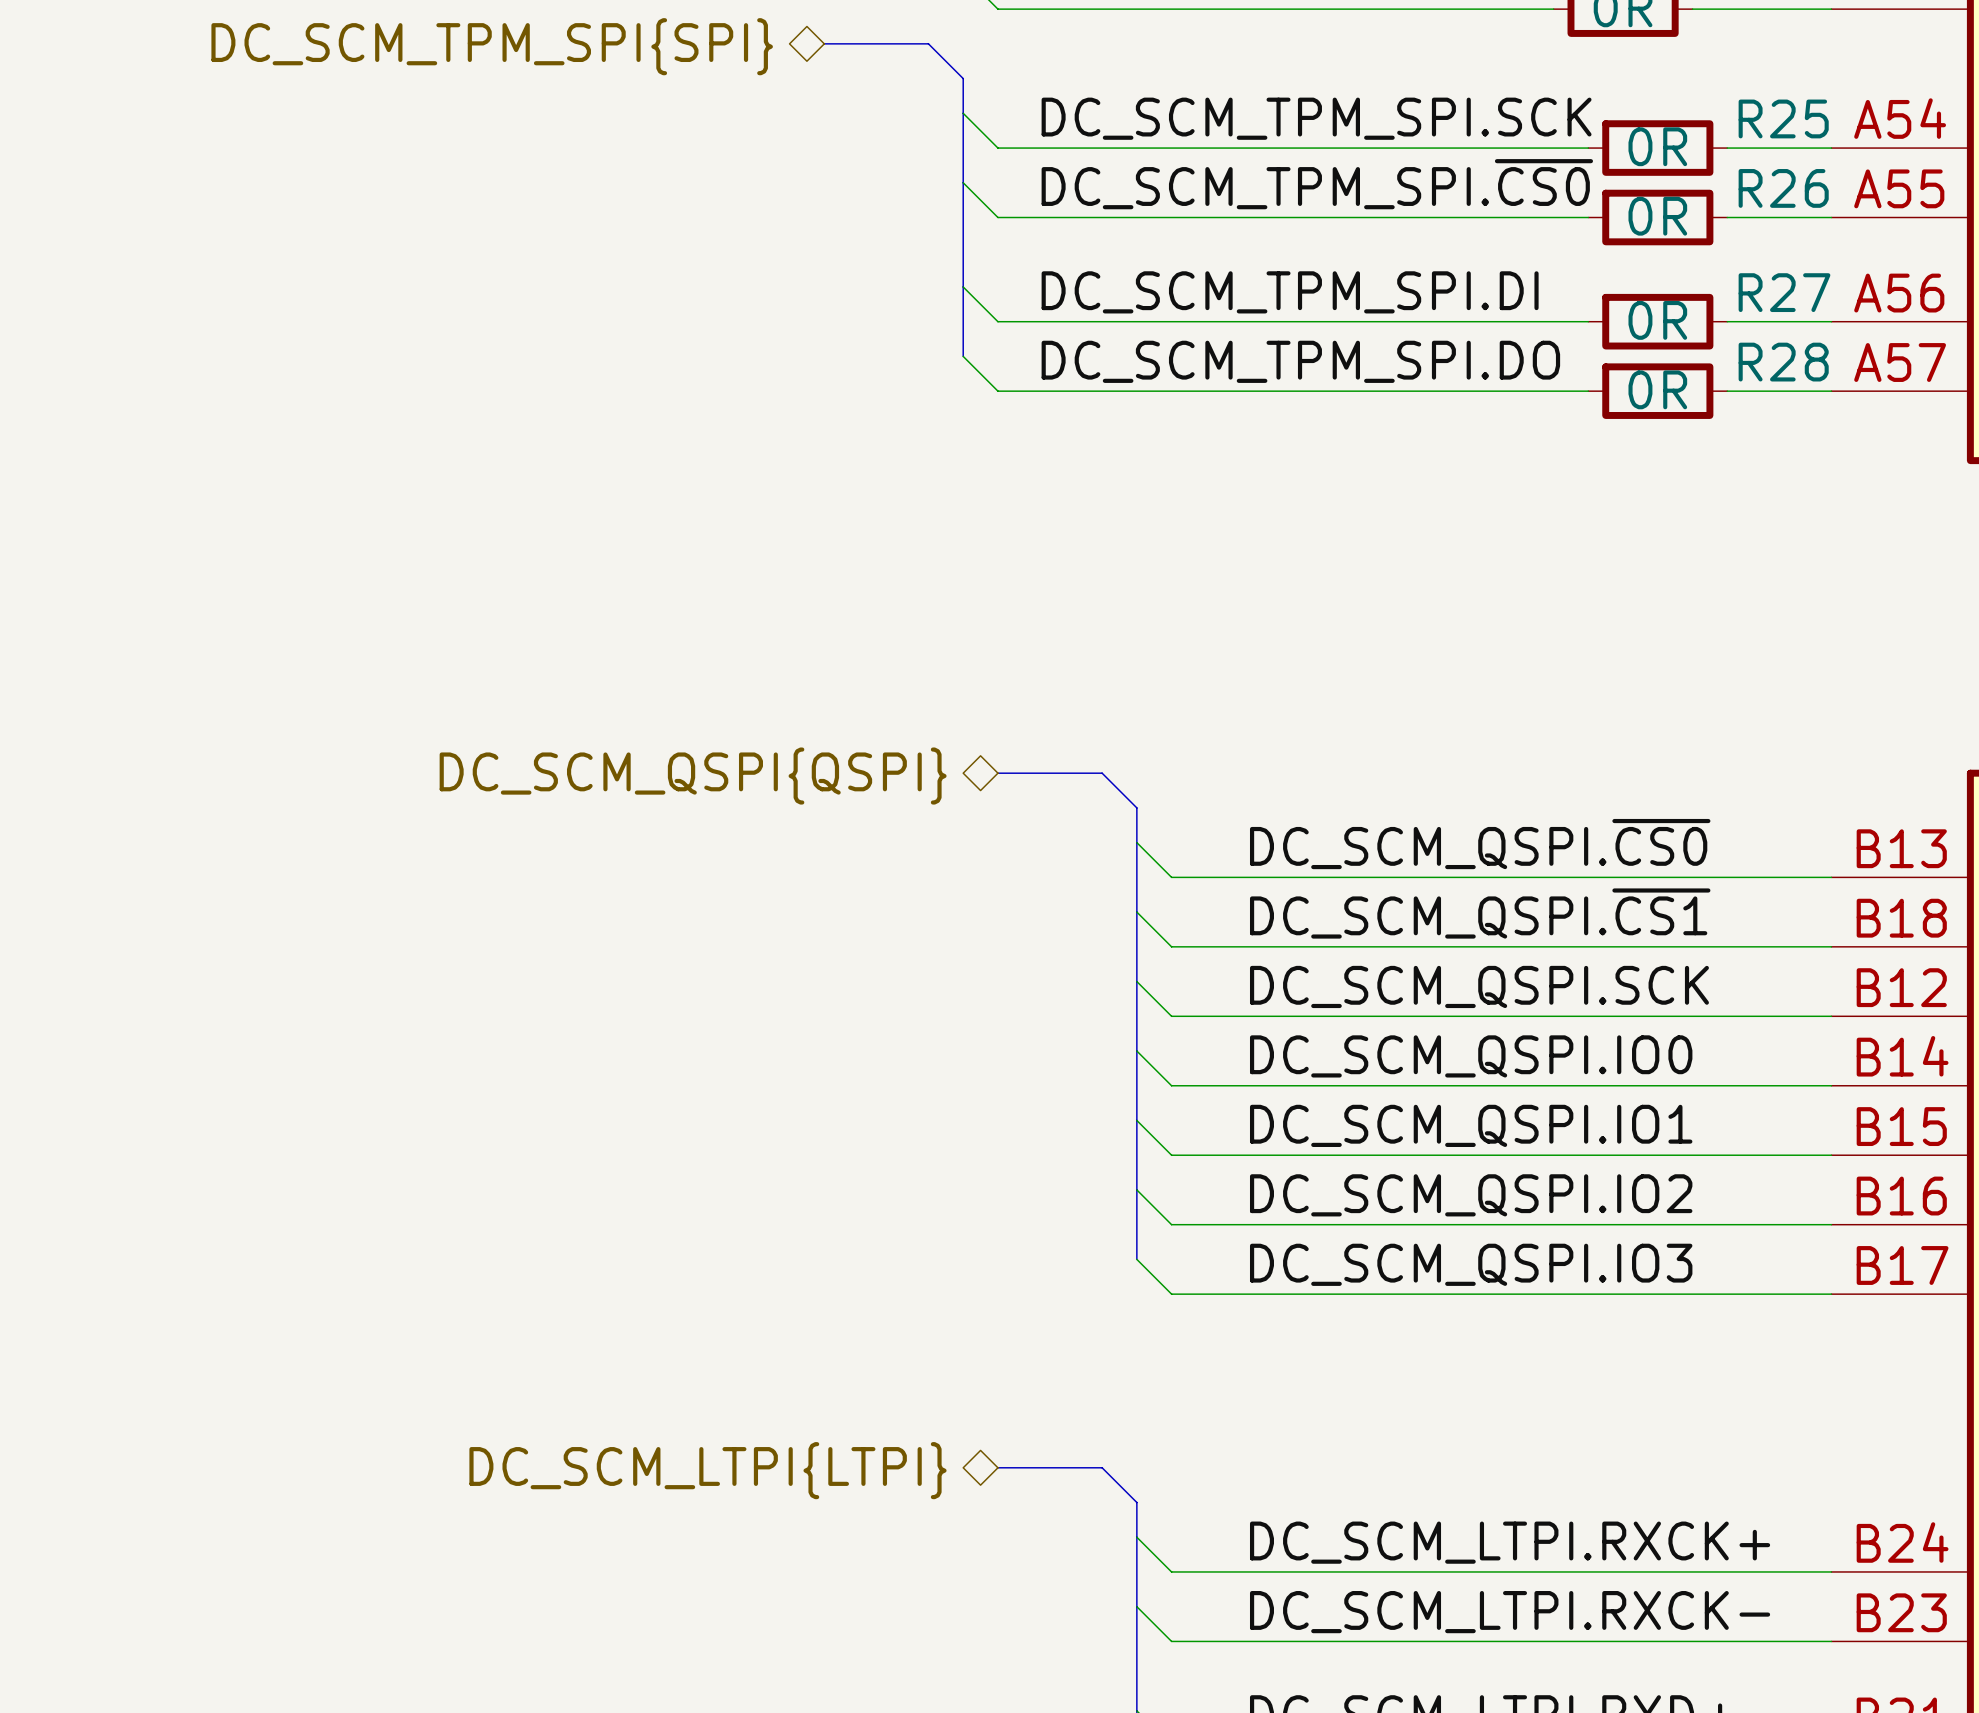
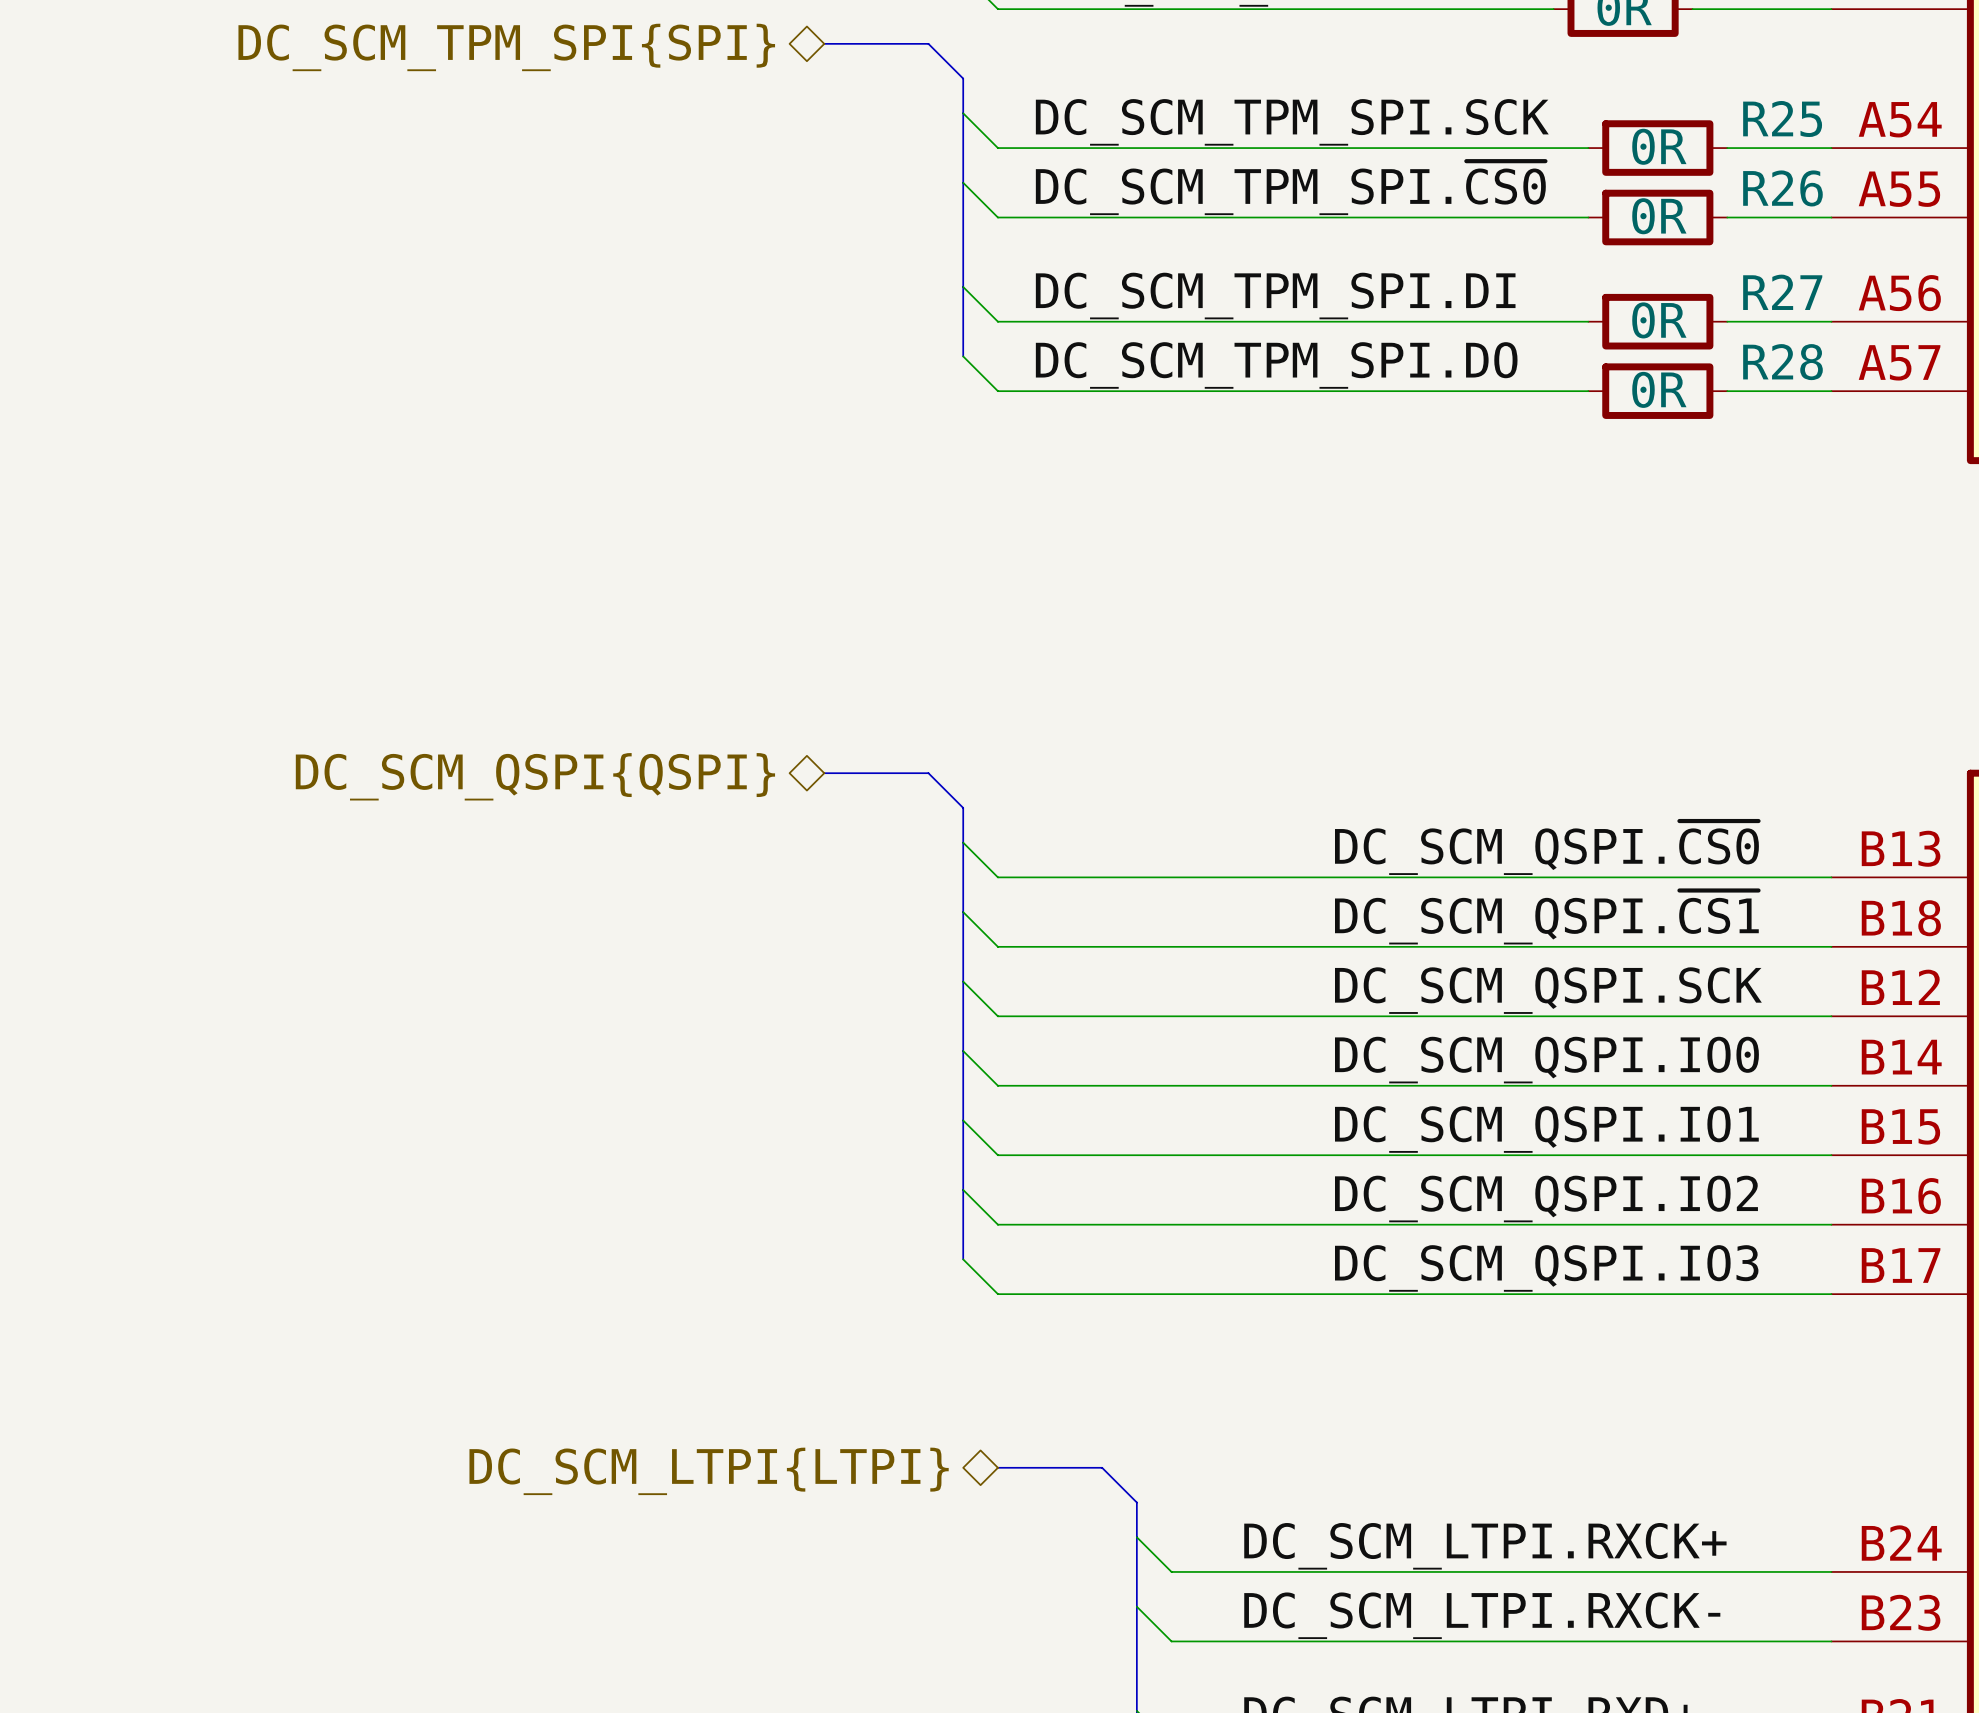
bus: (997, 773) (1102, 773) (1136, 807) (1136, 1259) -> (824, 773) (928, 773) (963, 807) (963, 1259)
hierarchical label position: DC_SCM_QSPI{QSPI} (693, 776) -> DC_SCM_QSPI{QSPI} (535, 776)
wire: (1136, 842) (1171, 877) -> (963, 842) (997, 877) (1171, 877)
label position: DC_SCM_QSPI.~{CS0} (1480, 844) -> DC_SCM_QSPI.~{CS0} (1546, 848)
wire: (1136, 912) (1171, 946) -> (963, 912) (997, 946) (1171, 946)
label position: DC_SCM_QSPI.~{CS1} (1480, 913) -> DC_SCM_QSPI.~{CS1} (1546, 917)
wire: (1136, 981) (1171, 1016) -> (963, 981) (997, 1016) (1171, 1016)
label position: DC_SCM_QSPI.SCK (1479, 986) -> DC_SCM_QSPI.SCK (1548, 990)
wire: (1136, 1051) (1171, 1085) -> (963, 1051) (997, 1085) (1171, 1085)
label position: DC_SCM_QSPI.IO0 (1471, 1056) -> DC_SCM_QSPI.IO0 (1546, 1060)
wire: (1136, 1120) (1171, 1155) -> (963, 1120) (997, 1155) (1171, 1155)
label position: DC_SCM_QSPI.IO1 (1471, 1125) -> DC_SCM_QSPI.IO1 (1546, 1129)
wire: (1136, 1189) (1171, 1224) -> (963, 1189) (997, 1224) (1171, 1224)
label position: DC_SCM_QSPI.IO2 (1471, 1195) -> DC_SCM_QSPI.IO2 (1546, 1198)
wire: (1136, 1259) (1171, 1294) -> (963, 1259) (997, 1294) (1171, 1294)
label position: DC_SCM_QSPI.IO3 (1471, 1264) -> DC_SCM_QSPI.IO3 (1546, 1268)

